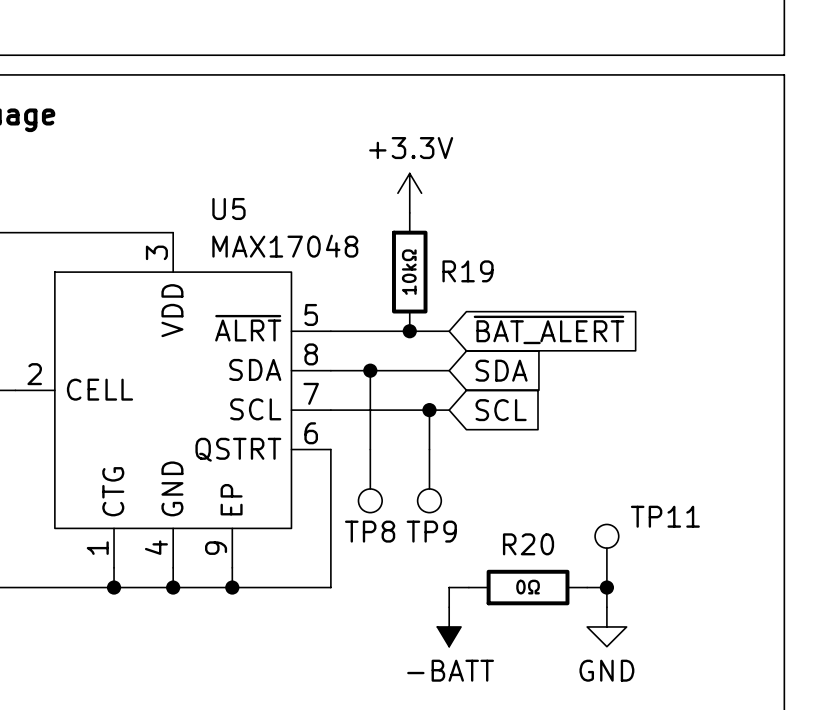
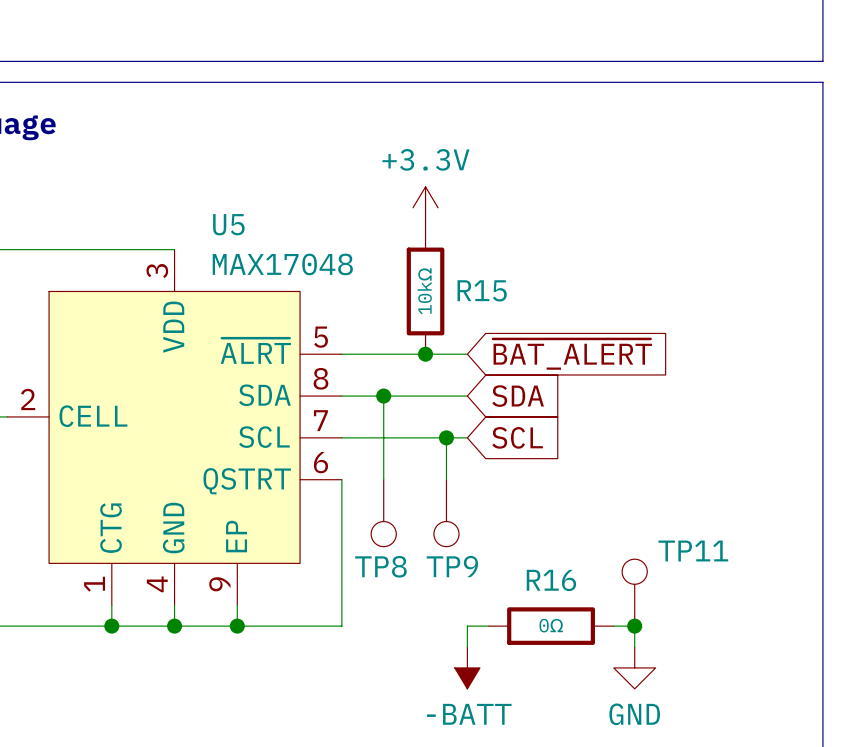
R19 name: R19 (468, 271) -> R15 (482, 290)
R20 name: R20 (528, 544) -> R16 (551, 580)

